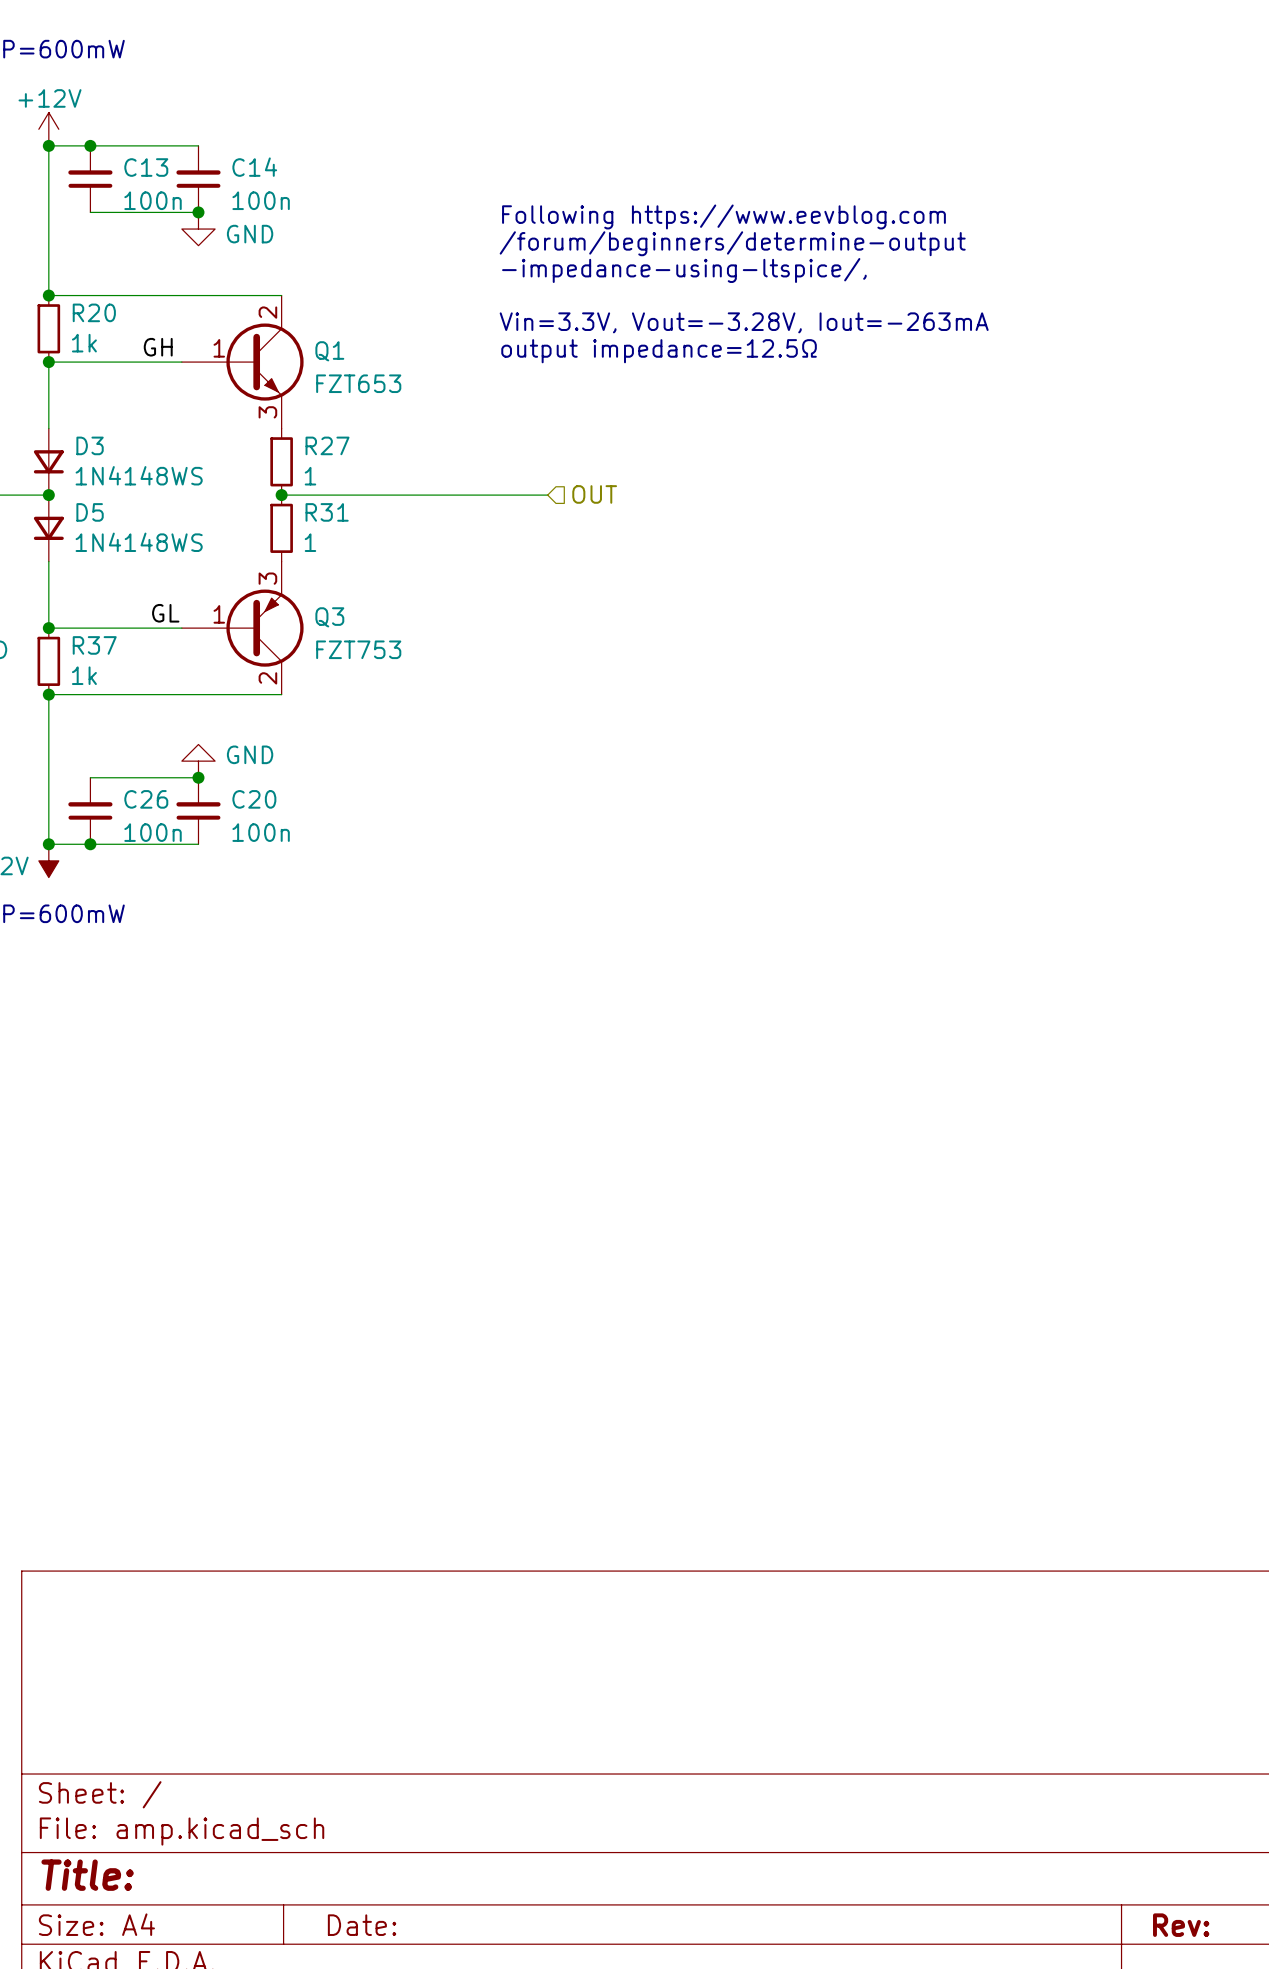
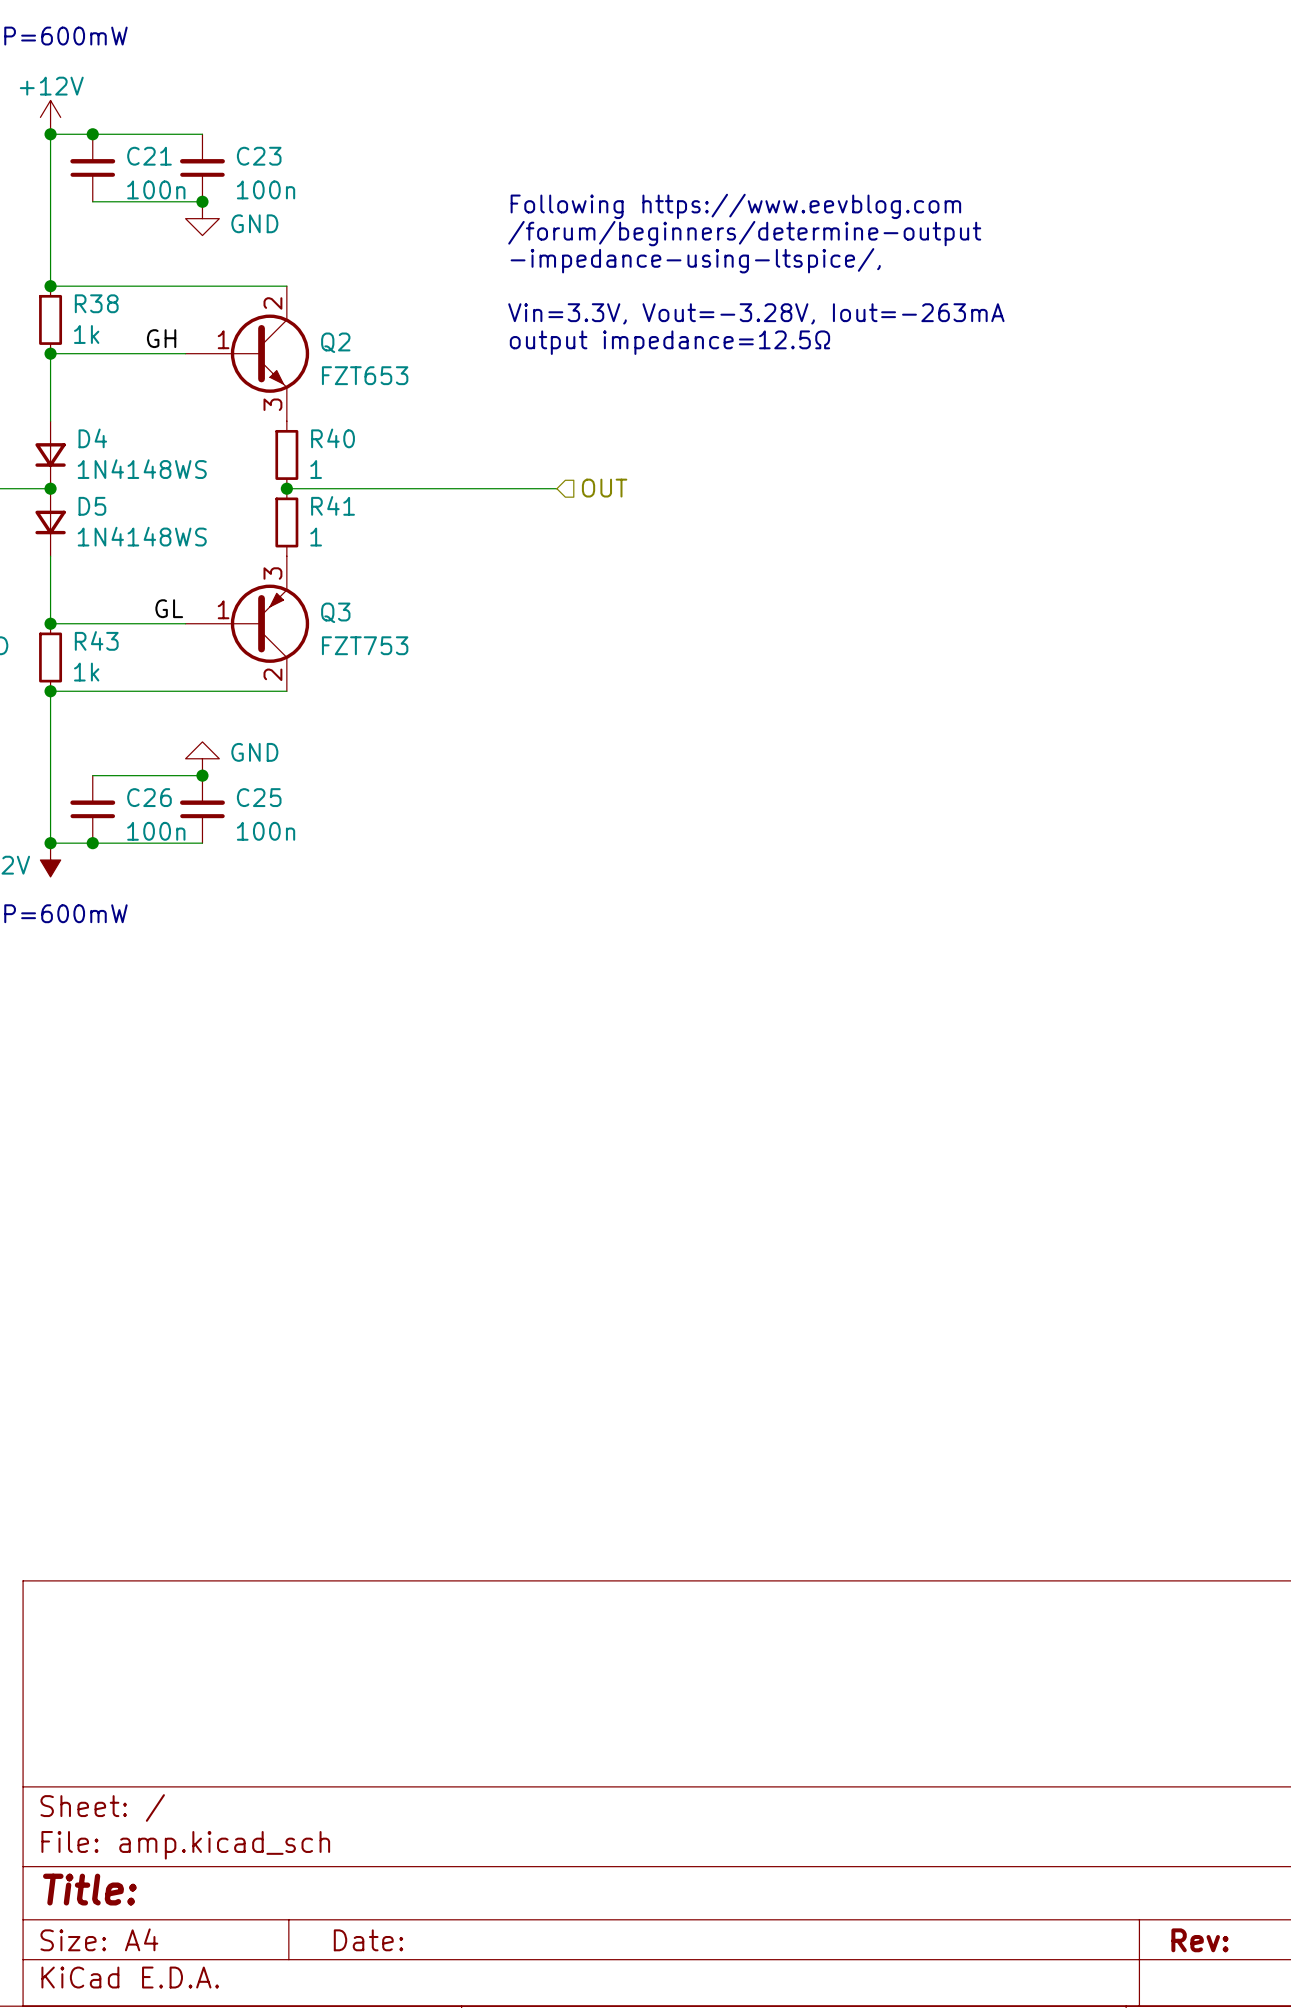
C13 name: C13 (146, 167) -> C21 (149, 156)
C14 name: C14 (254, 167) -> C23 (259, 156)
R20 name: R20 (94, 312) -> R38 (96, 303)
Q1 name: Q1 (329, 351) -> Q2 (335, 342)
D3 name: D3 (90, 445) -> D4 (92, 438)
R27 name: R27 (327, 445) -> R40 (333, 438)
R31 name: R31 (327, 512) -> R41 (333, 505)
R37 name: R37 (94, 645) -> R43 (96, 640)
C20 name: C20 (254, 799) -> C25 (259, 797)

